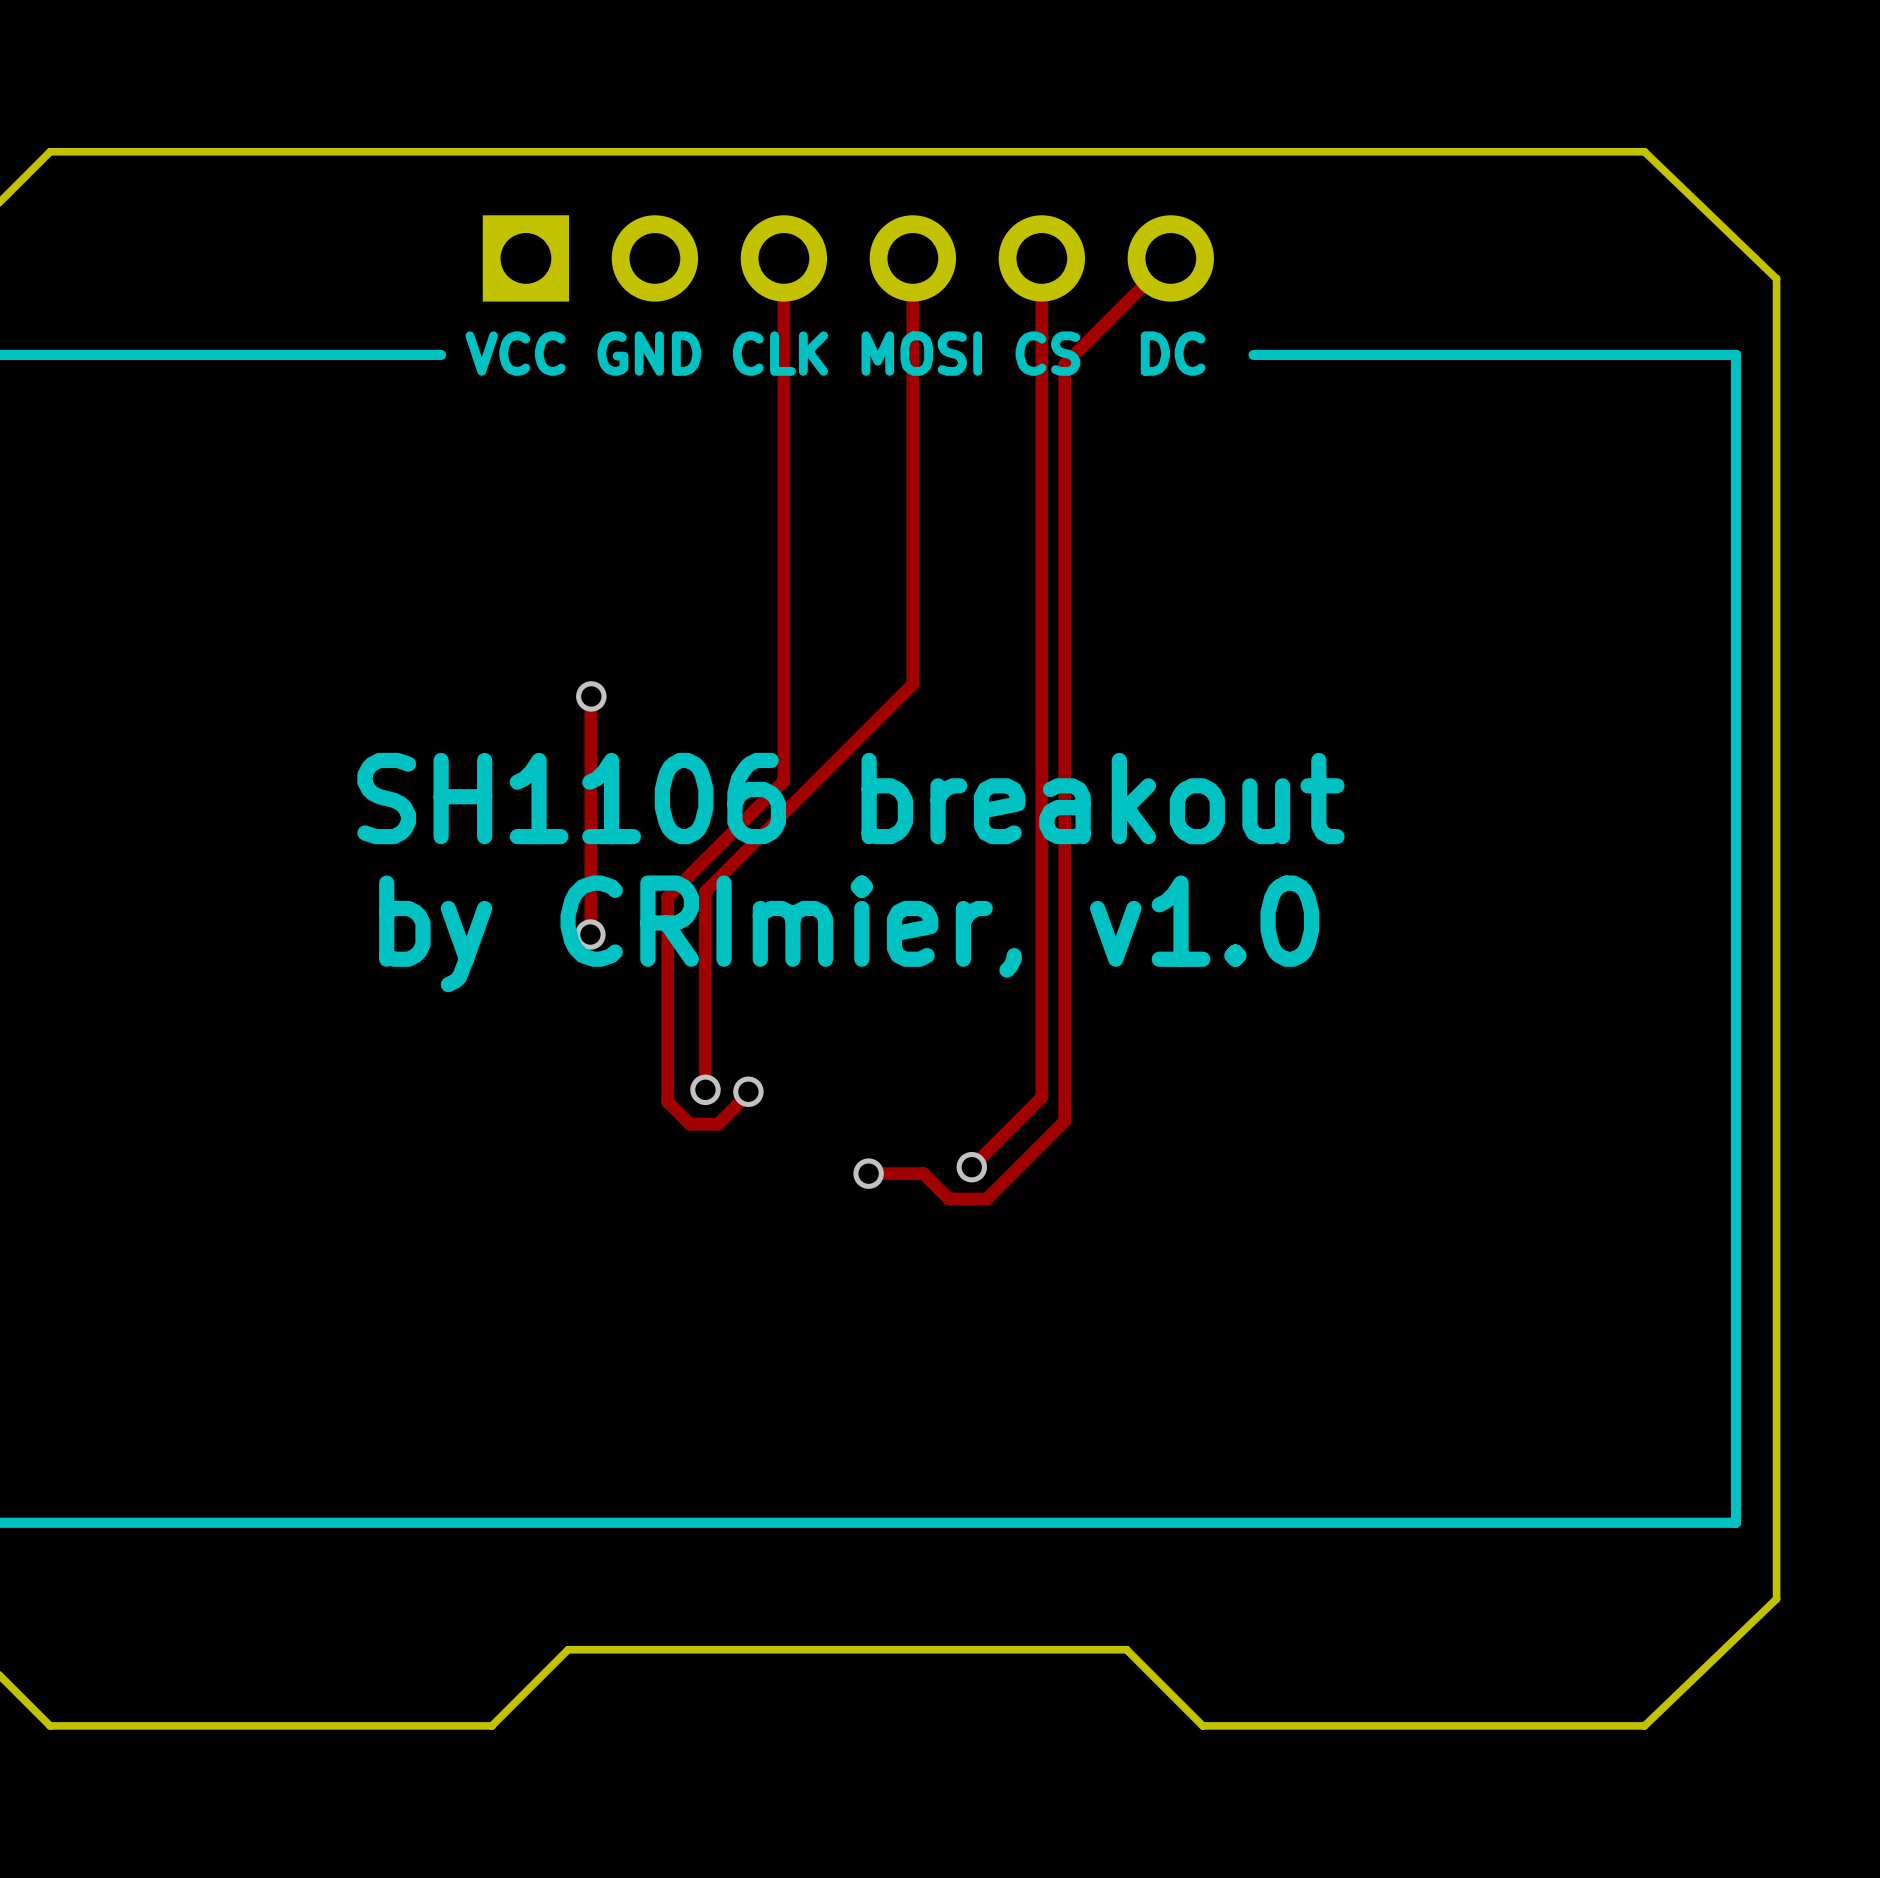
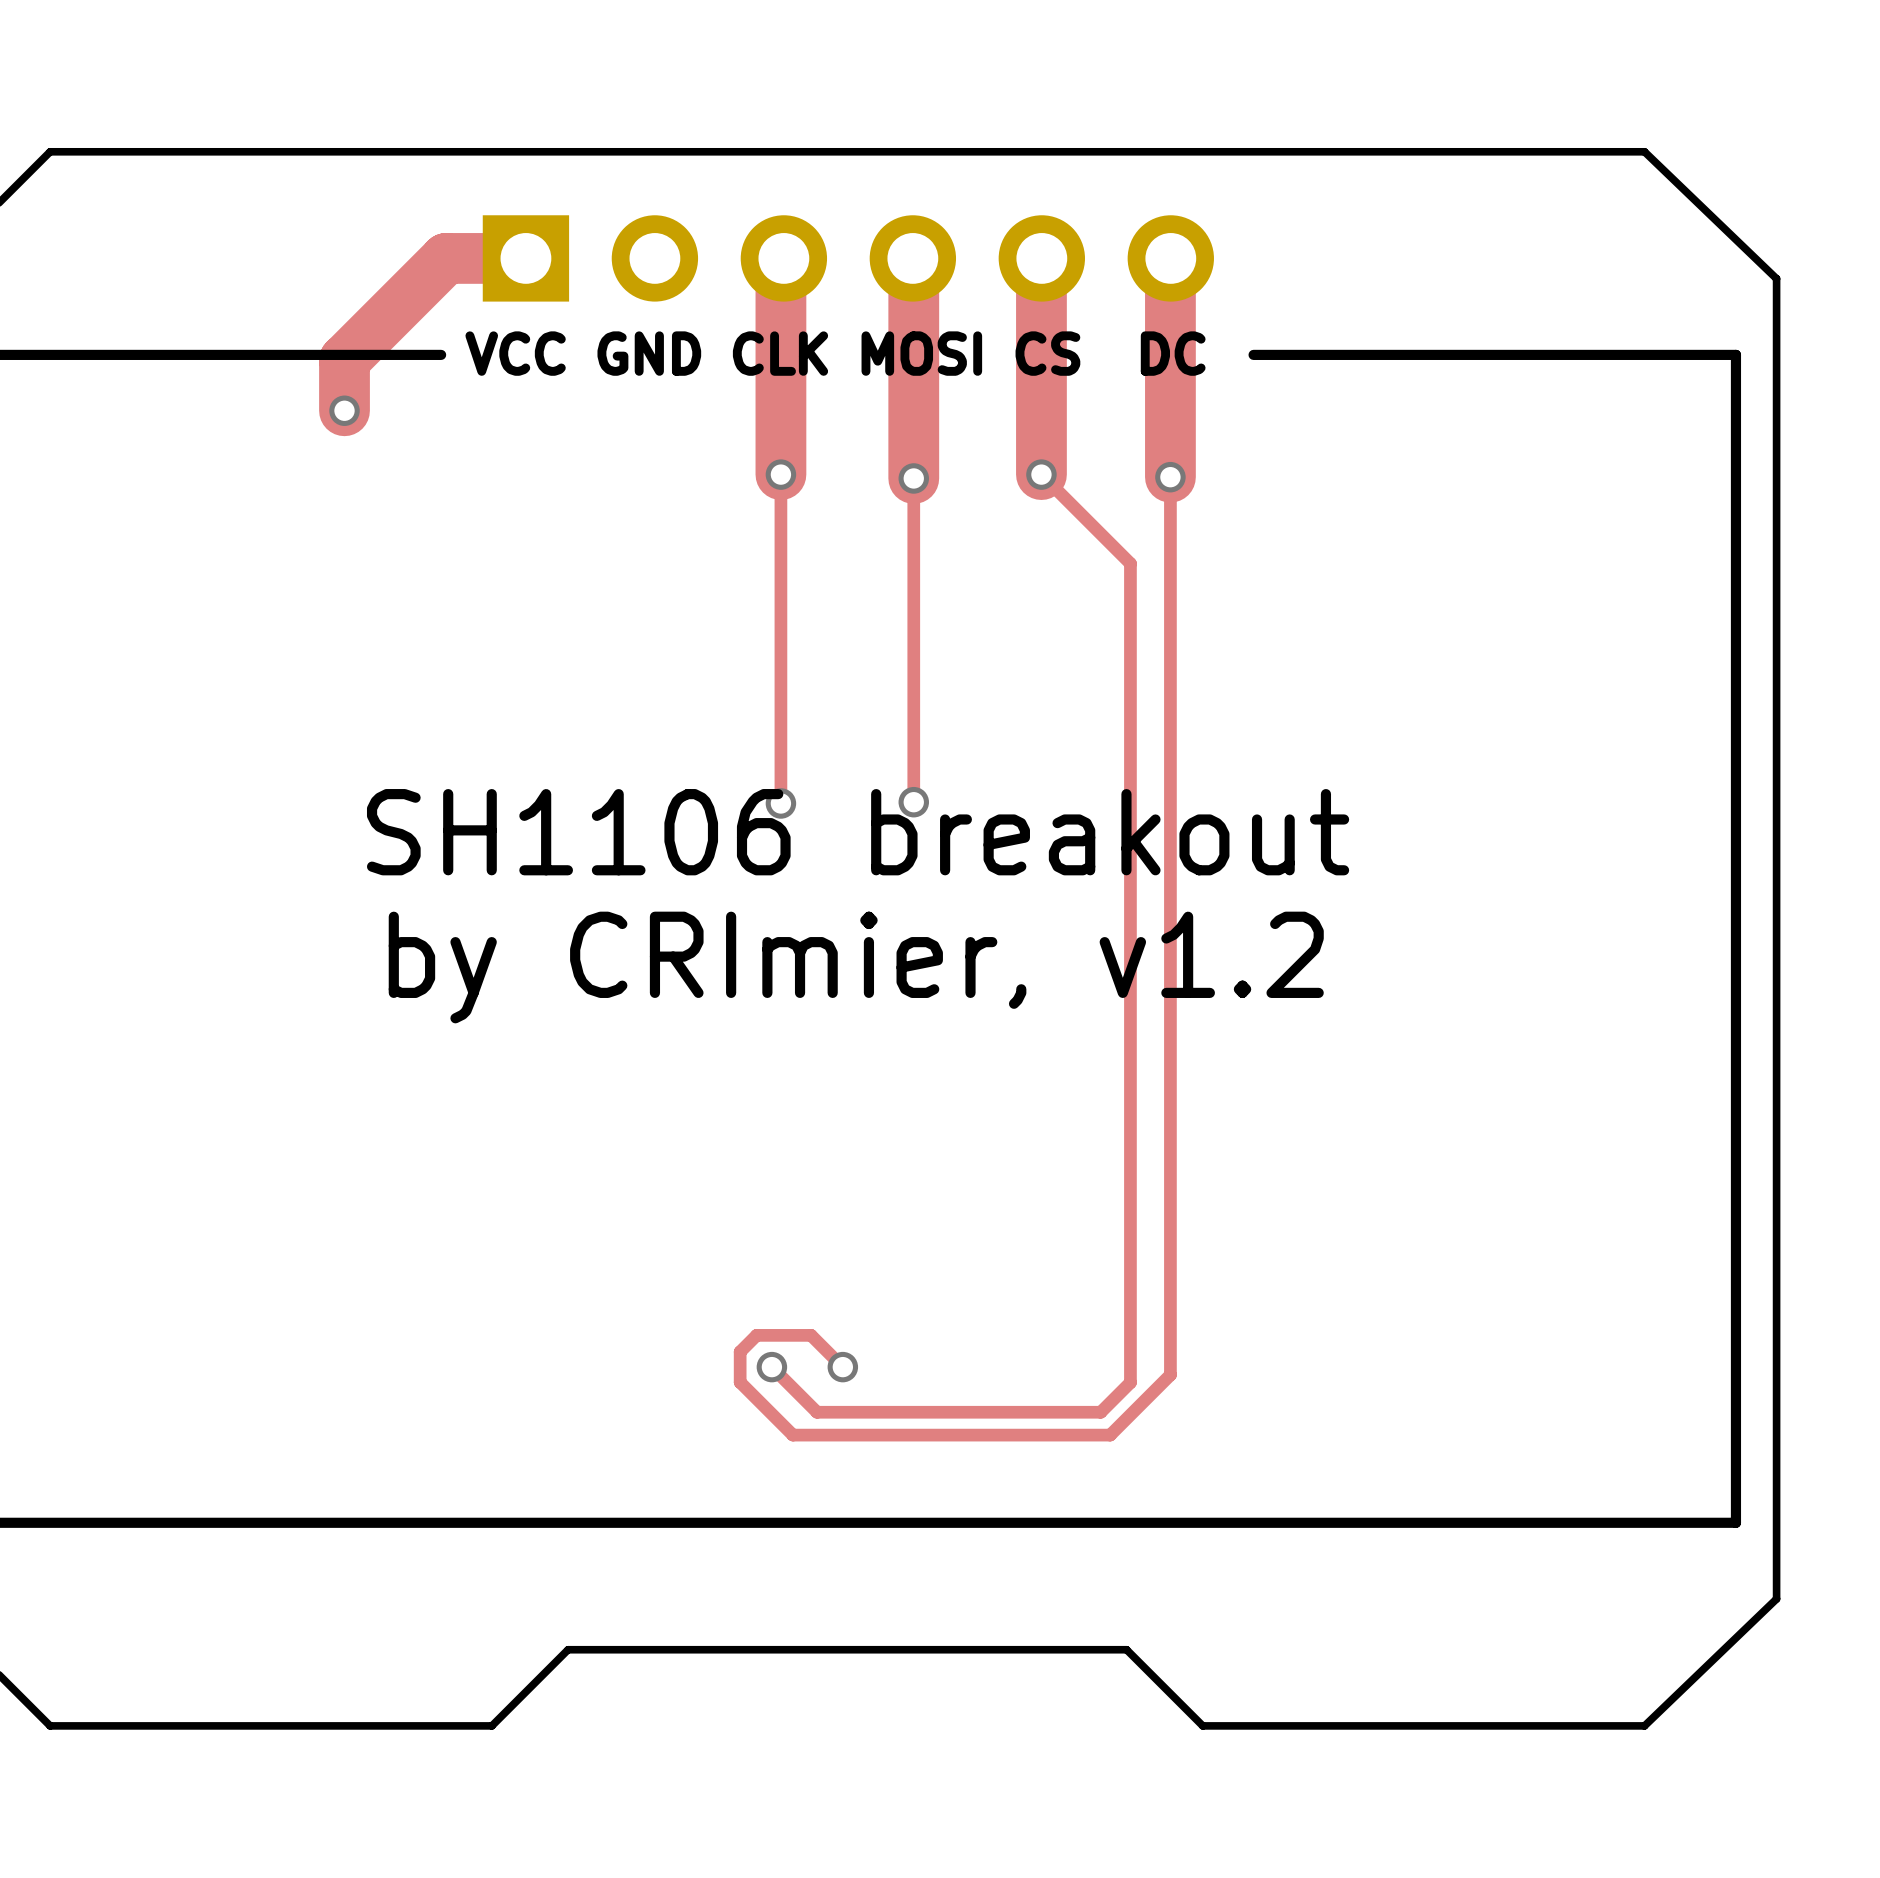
track: none -> (525, 258) (446, 258) (344, 360) (344, 410)
track: (783, 258) (783, 781) (667, 897) (667, 1101) (689, 1124) (718, 1124) (748, 1091) -> (783, 258) (780, 261) (780, 803)
track: (912, 258) (912, 684) (705, 892) (705, 1089) -> (912, 258) (913, 802)
track: (1041, 258) (1041, 1097) (971, 1167) -> (1041, 258) (1041, 474) (1130, 563) (1130, 1382) (1100, 1412) (817, 1412) (771, 1367)
track: (1170, 258) (1064, 364) (1064, 1121) (987, 1198) (948, 1198) (923, 1173) (868, 1173) -> (1170, 258) (1170, 1374) (1110, 1435) (792, 1435) (740, 1382) (740, 1351) (756, 1335) (811, 1335) (842, 1367)
via: none -> (344, 410)
via: none -> (780, 474)
via: none -> (1041, 474)
via: none -> (1170, 477)
via: none -> (913, 478)
track: (590, 696) (590, 934) -> none
via: (591, 696) -> none
text position: SH1106 breakout (850, 798) -> SH1106 breakout (858, 832)
via: none -> (913, 802)
via: none -> (780, 803)
text: by CRImier, v1.0 (849, 933) -> by CRImier, v1.2 (856, 967)
via: (590, 934) -> none
via: (705, 1089) -> none
via: (748, 1091) -> none
via: (971, 1167) -> none
via: (868, 1173) -> none
via: none -> (771, 1367)
via: none -> (842, 1367)

